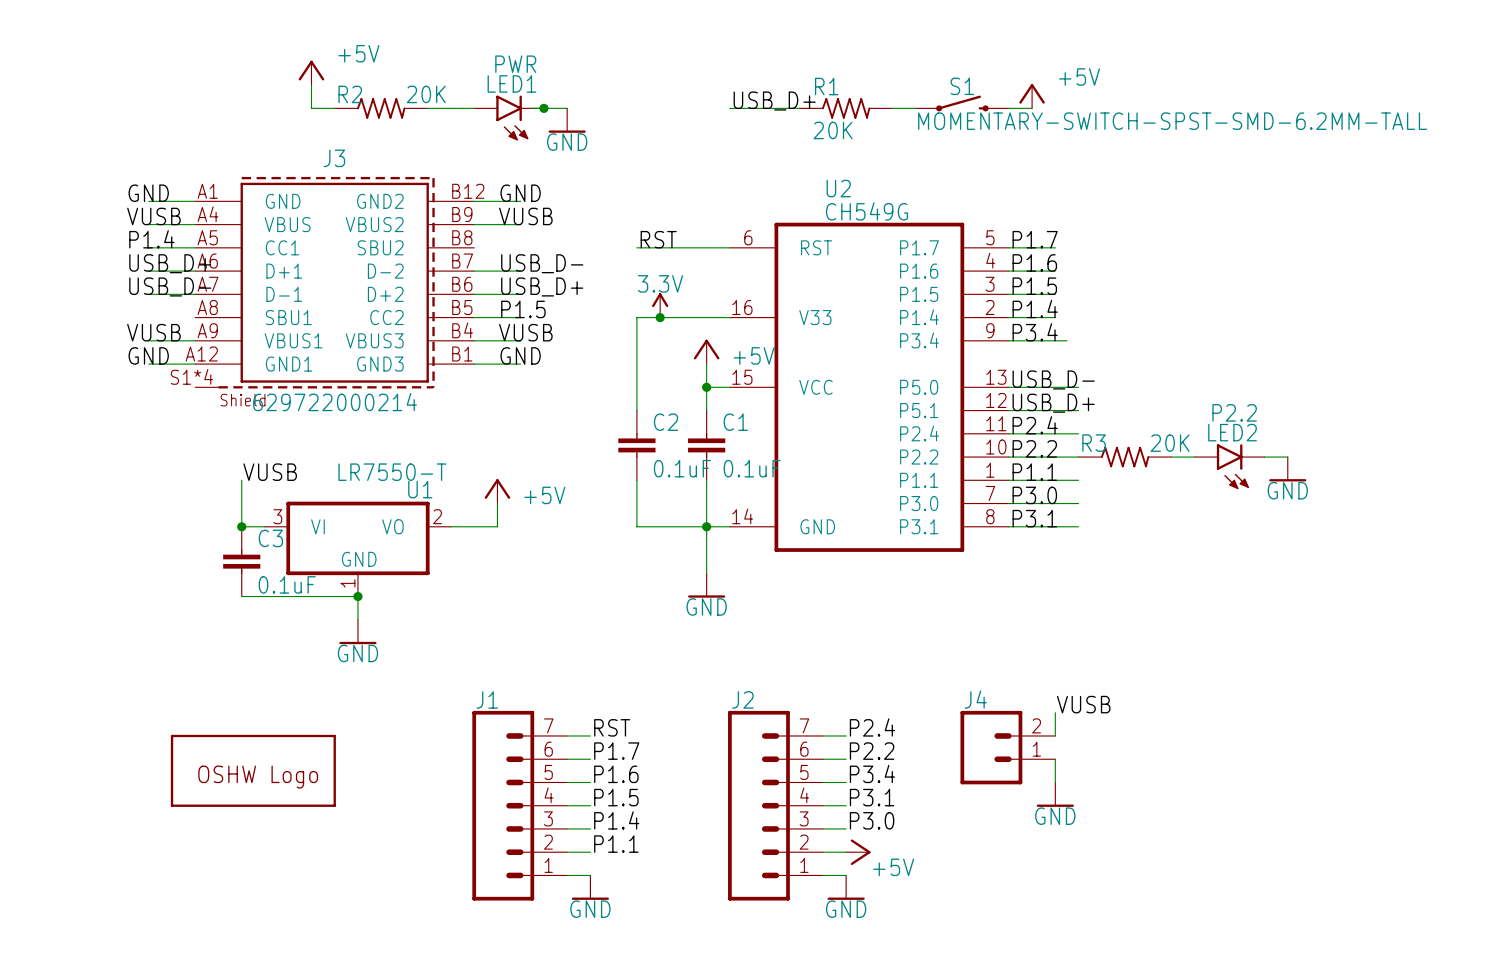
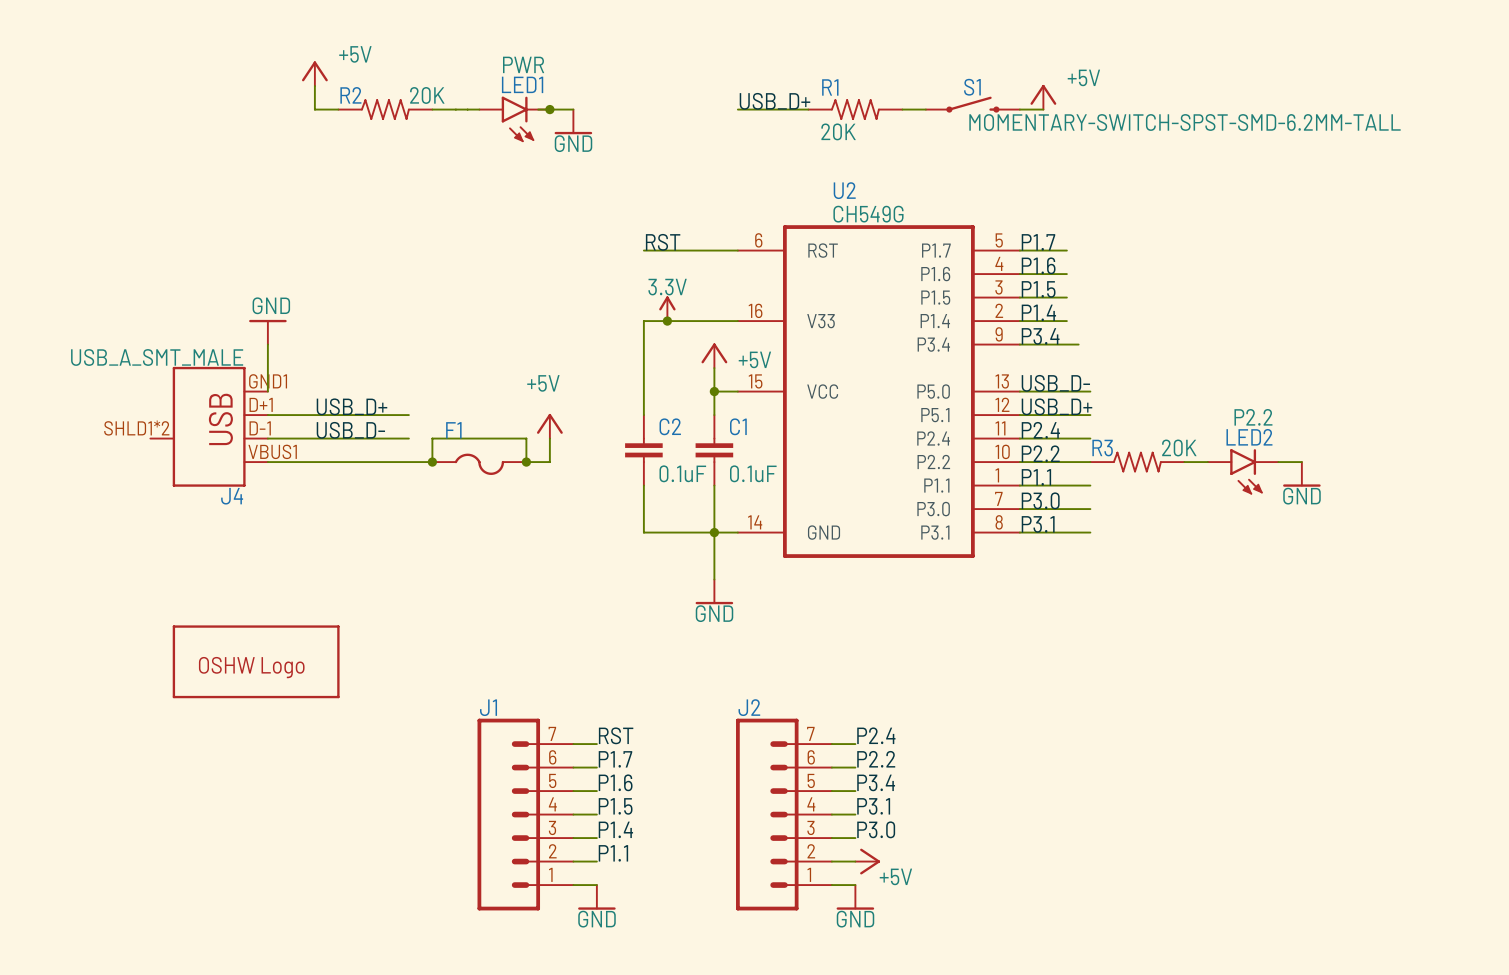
label: GND (148, 193) -> none
label: GND (520, 193) -> none
wire: (148, 201) (195, 201) -> none
wire: (474, 201) (520, 201) -> none
label: VUSB (153, 216) -> none
label: VUSB (525, 216) -> none
wire: (148, 224) (195, 224) -> none
wire: (474, 224) (520, 224) -> none
label: P1.4 (151, 239) -> none
wire: (148, 247) (195, 247) -> none
label: USB_D+ (170, 263) -> none
label: USB_D- (542, 263) -> none
wire: (148, 271) (195, 271) -> none
wire: (474, 271) (520, 271) -> none
J3: 629722000214 (334, 282) -> none
label: USB_D- (170, 286) -> none
label: USB_D+ (542, 286) -> none
wire: (148, 294) (195, 294) -> none
wire: (474, 294) (520, 294) -> none
label: P1.5 (523, 309) -> none
wire: (474, 317) (520, 317) -> none
power symbol: none -> GND (267, 332)
label: VUSB (153, 332) -> none
label: VUSB (525, 332) -> none
wire: (148, 340) (195, 340) -> none
wire: none -> (267, 344) (267, 391)
wire: (474, 340) (520, 340) -> none
J4 value: none -> USB_A_SMT_MALE (157, 357)
label: GND (148, 355) -> none
label: GND (520, 355) -> none
wire: (474, 364) (520, 364) -> none
label: none -> USB_D+ (351, 406)
wire: none -> (267, 415) (408, 415)
label: none -> USB_D- (350, 430)
wire: none -> (267, 438) (408, 438)
wire: none -> (549, 438) (549, 462) (526, 462) (526, 438) (432, 438) (432, 462) (267, 462)
junction: none -> (432, 462)
junction: none -> (526, 462)
F1: none -> (479, 464)
label: VUSB (270, 472) -> none
wire: (241, 480) (241, 526) (264, 526) -> none
power symbol position: +5V (497, 491) -> +5V (549, 426)
power symbol text position: +5V (544, 495) -> +5V (543, 383)
wire: (497, 503) (497, 526) (450, 526) -> none
junction: (241, 526) -> none
U1: (357, 549) -> none
C3: 0.1uF (241, 561) -> none
wire: (241, 596) (357, 596) (357, 619) -> none
junction: (357, 596) -> none
power symbol: GND (357, 631) -> none
J4 name position: J4 (975, 699) -> J4 (232, 496)
label: VUSB (1083, 704) -> none
J4 symbol: [960, 710, 1056, 785] -> [150, 366, 268, 487]
wire: (1055, 712) (1055, 735) -> none
wire: (1055, 759) (1055, 782) -> none
part position: (253, 770) -> (256, 661)
power symbol: GND (1055, 794) -> none

